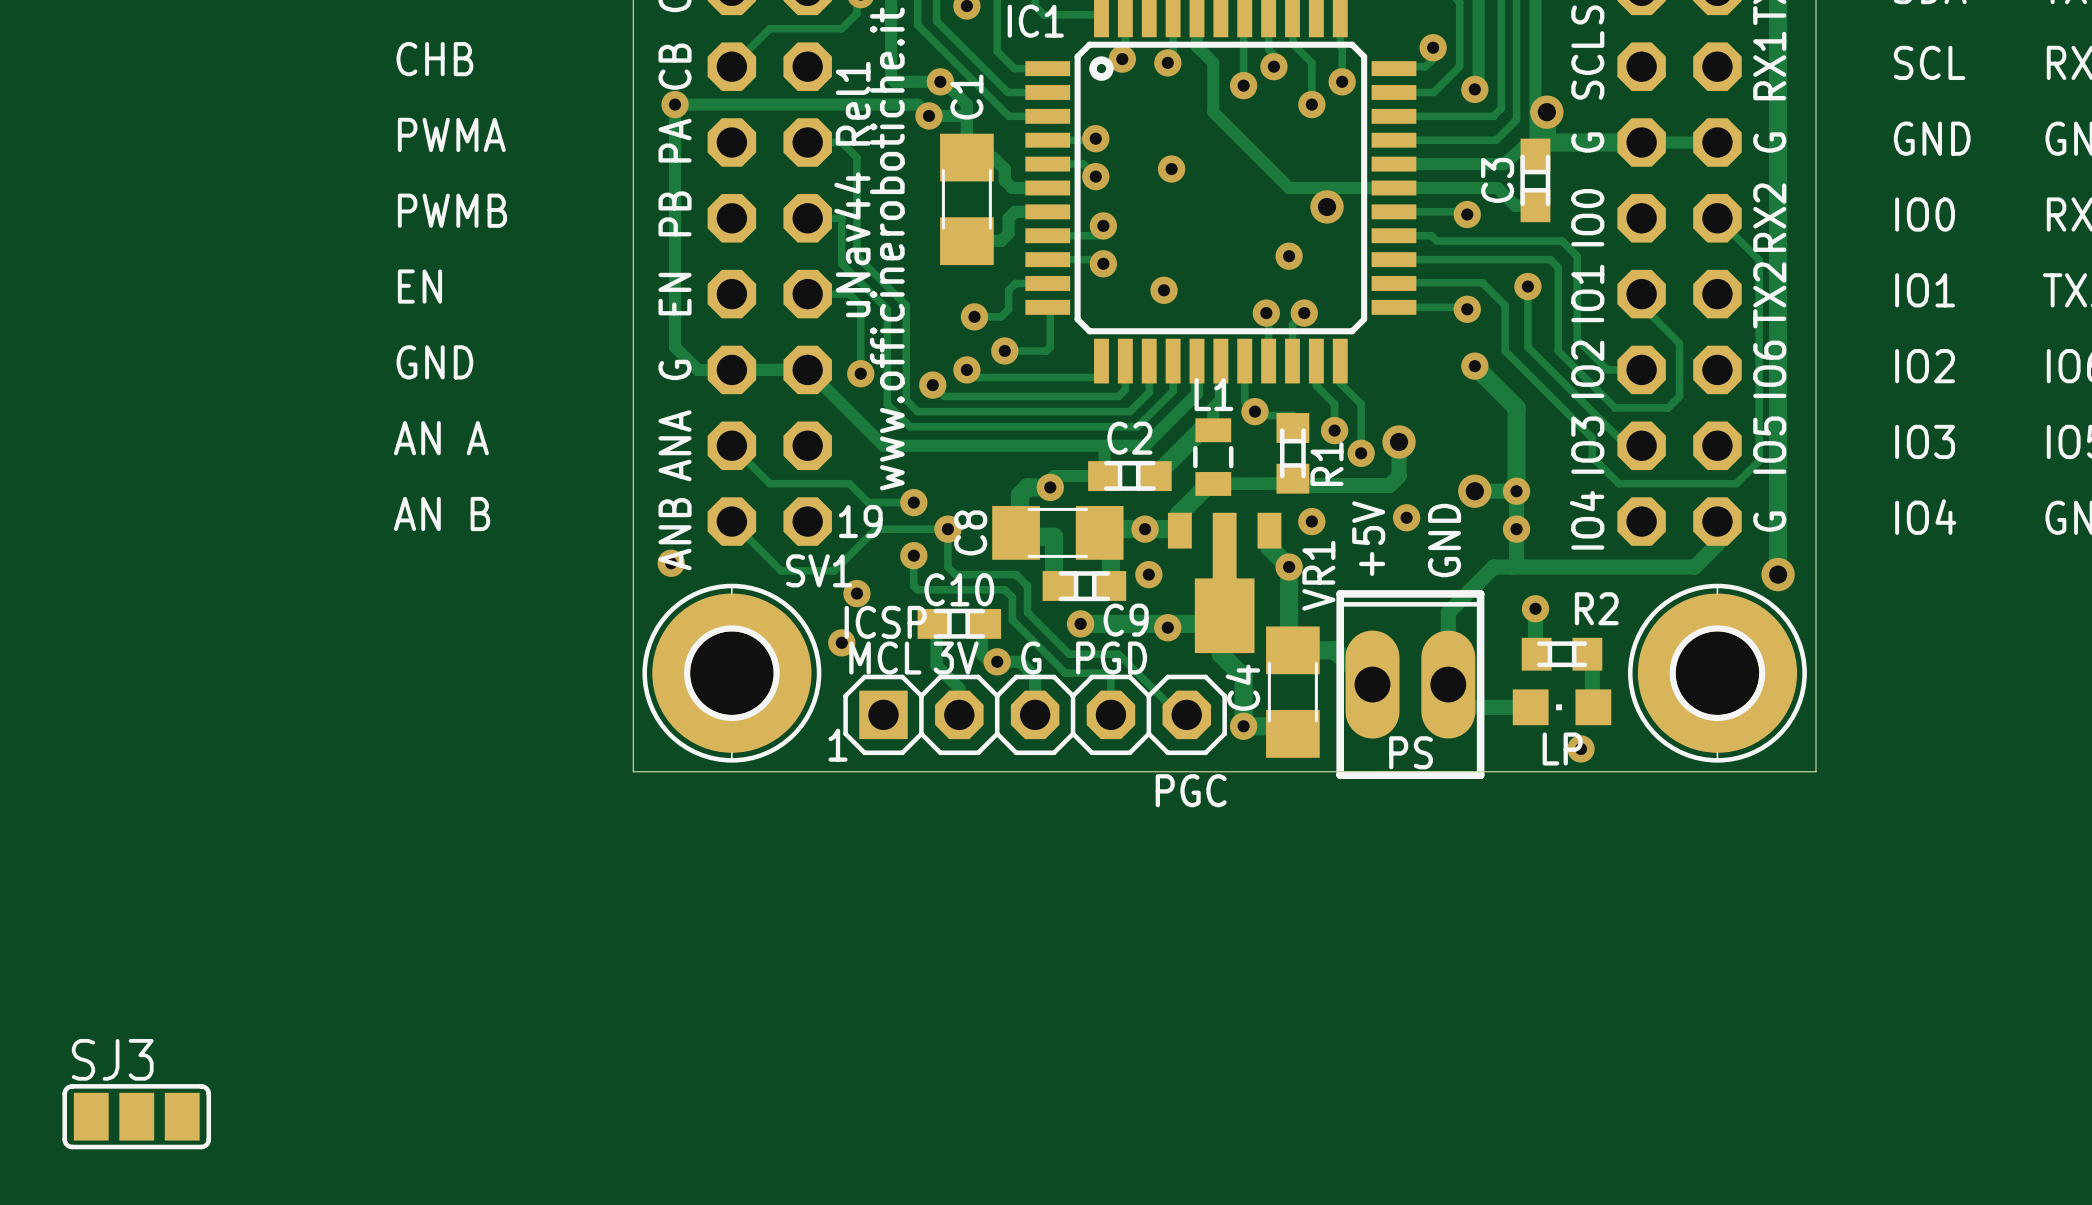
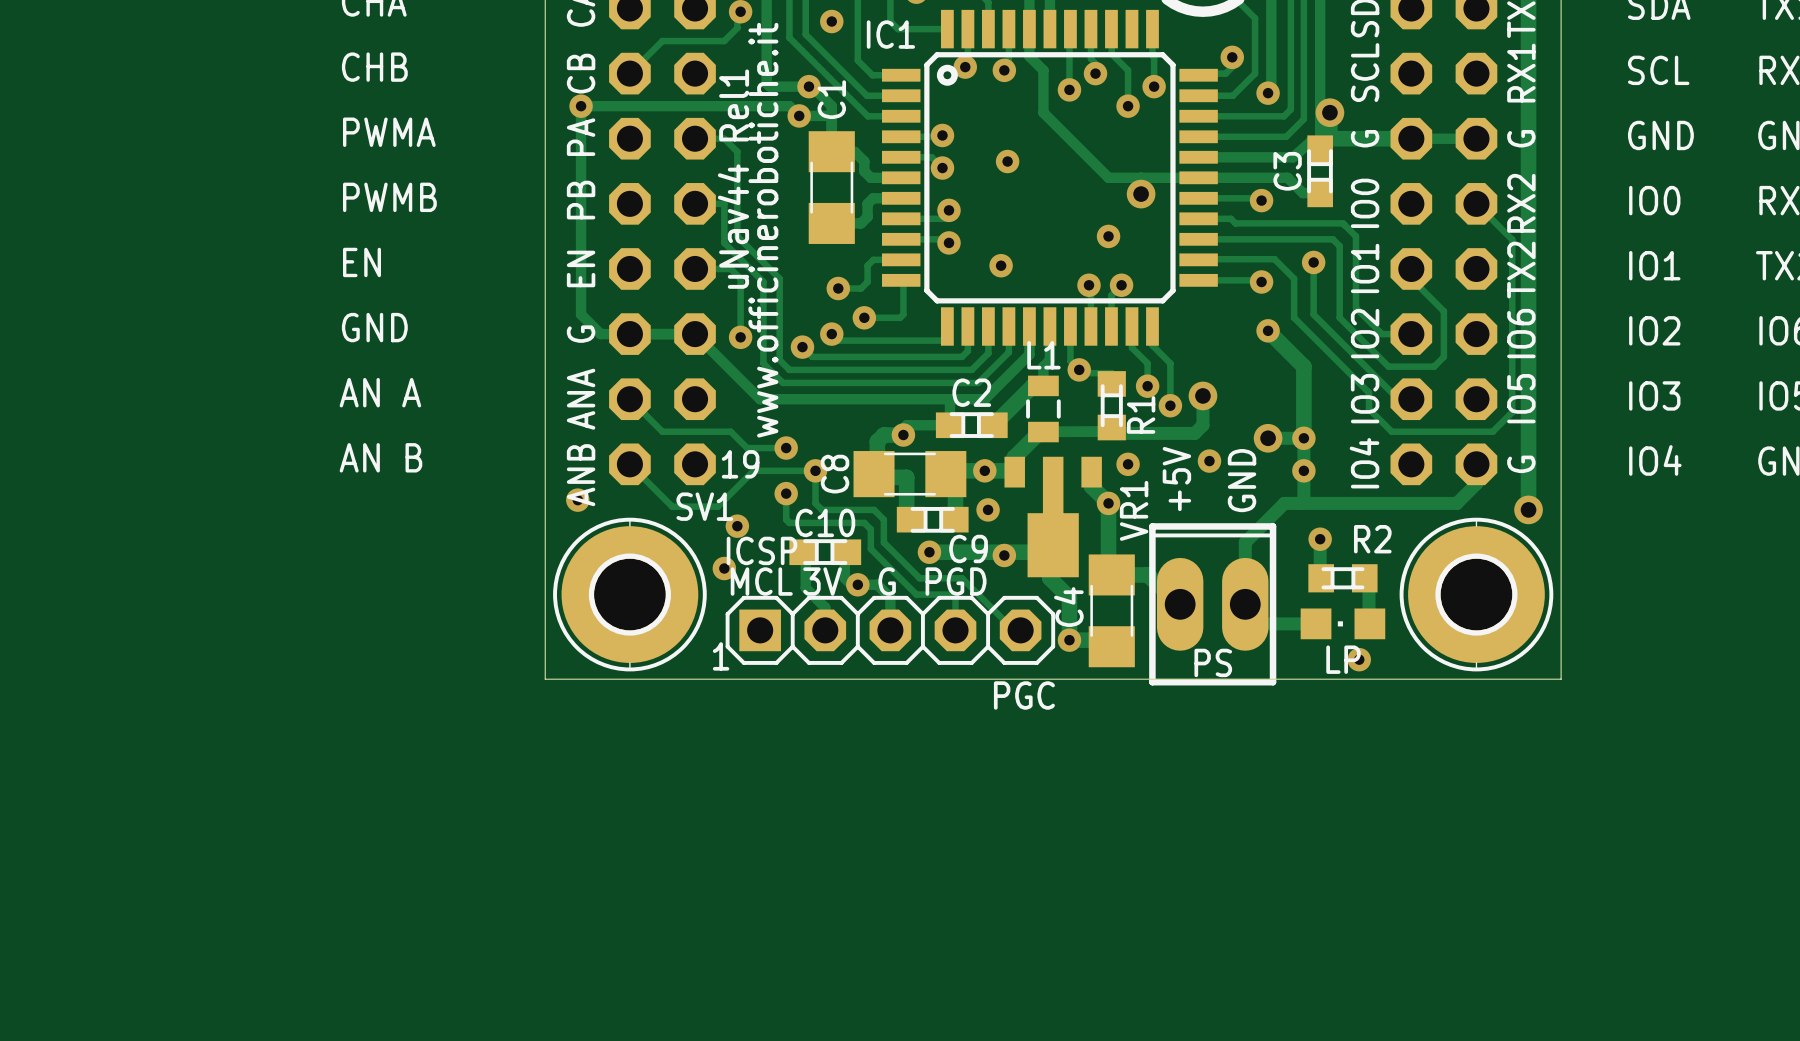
SJ3: (136, 1116) -> none

